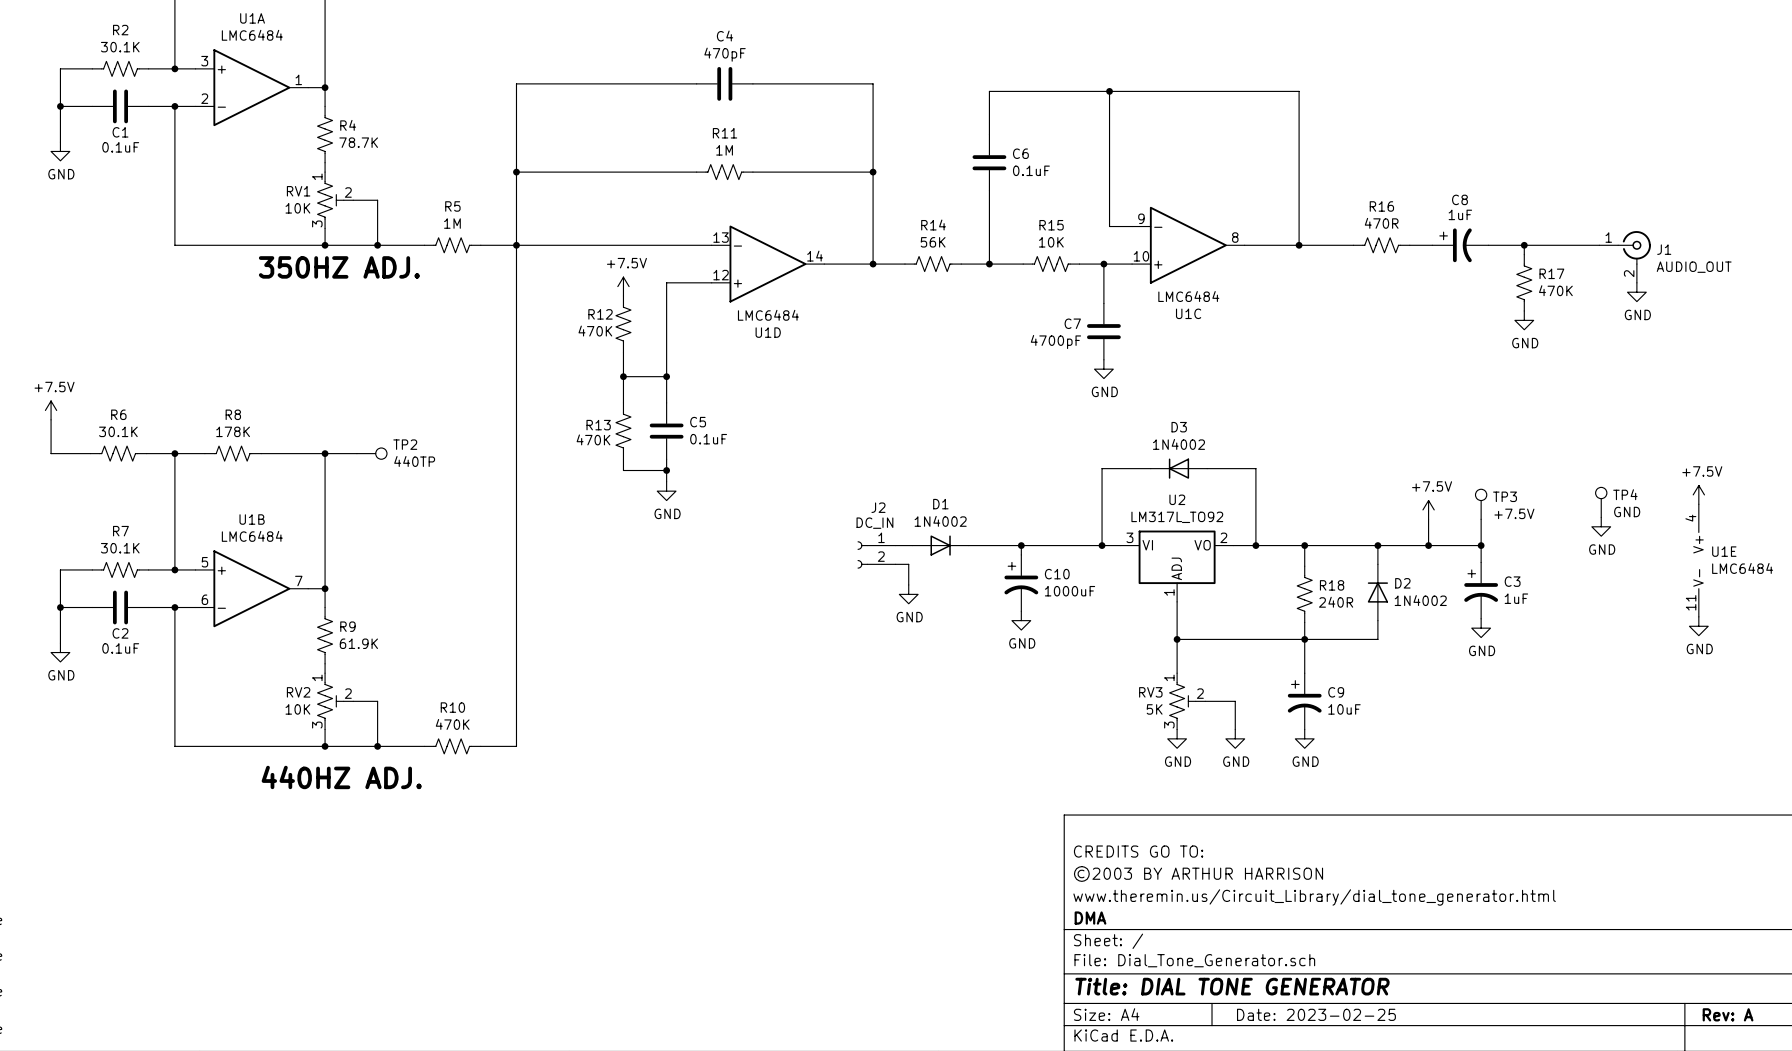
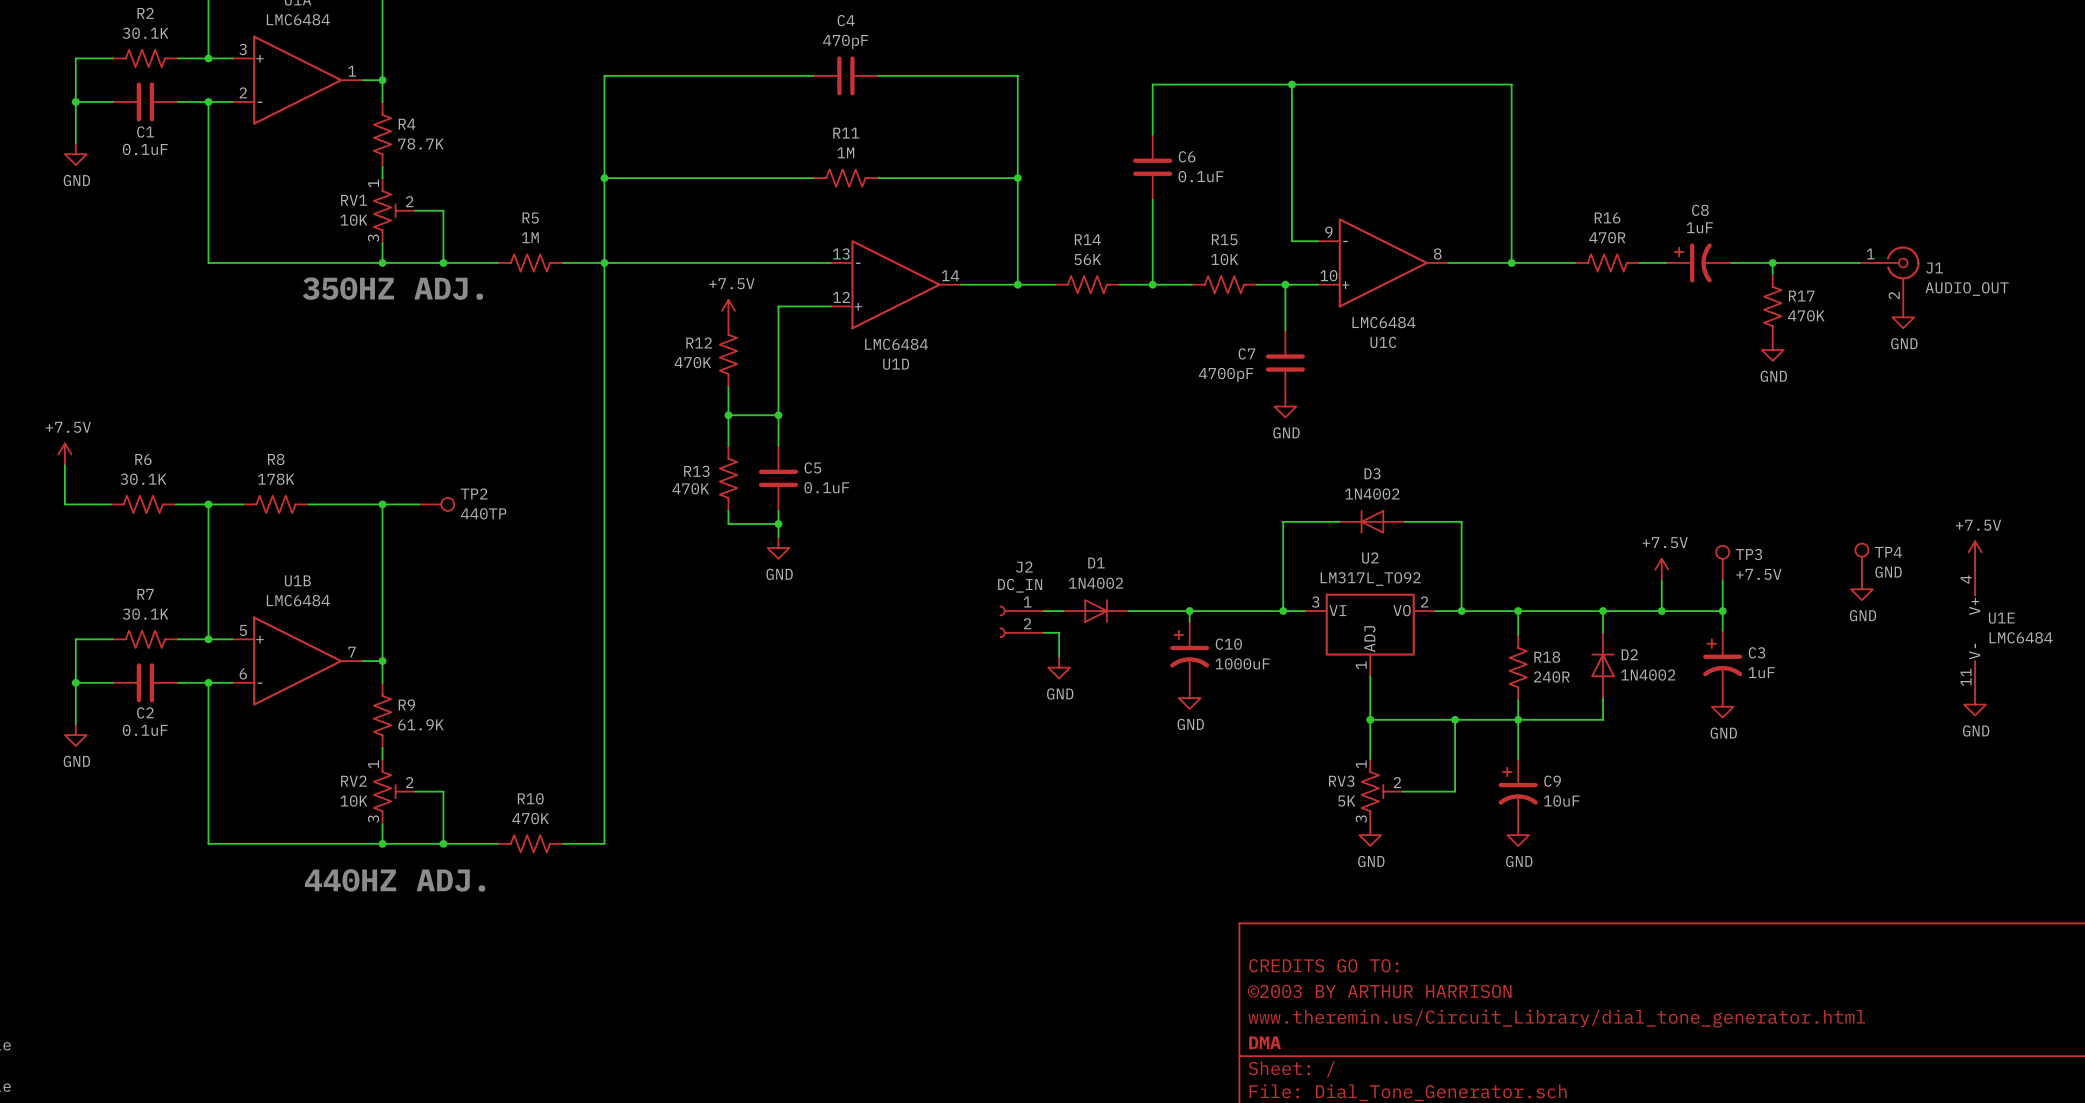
junction: none -> (1455, 719)
wire: (1235, 701) (1235, 729) -> (1437, 791) (1455, 791) (1455, 719)
power symbol: GND (1235, 738) -> none

